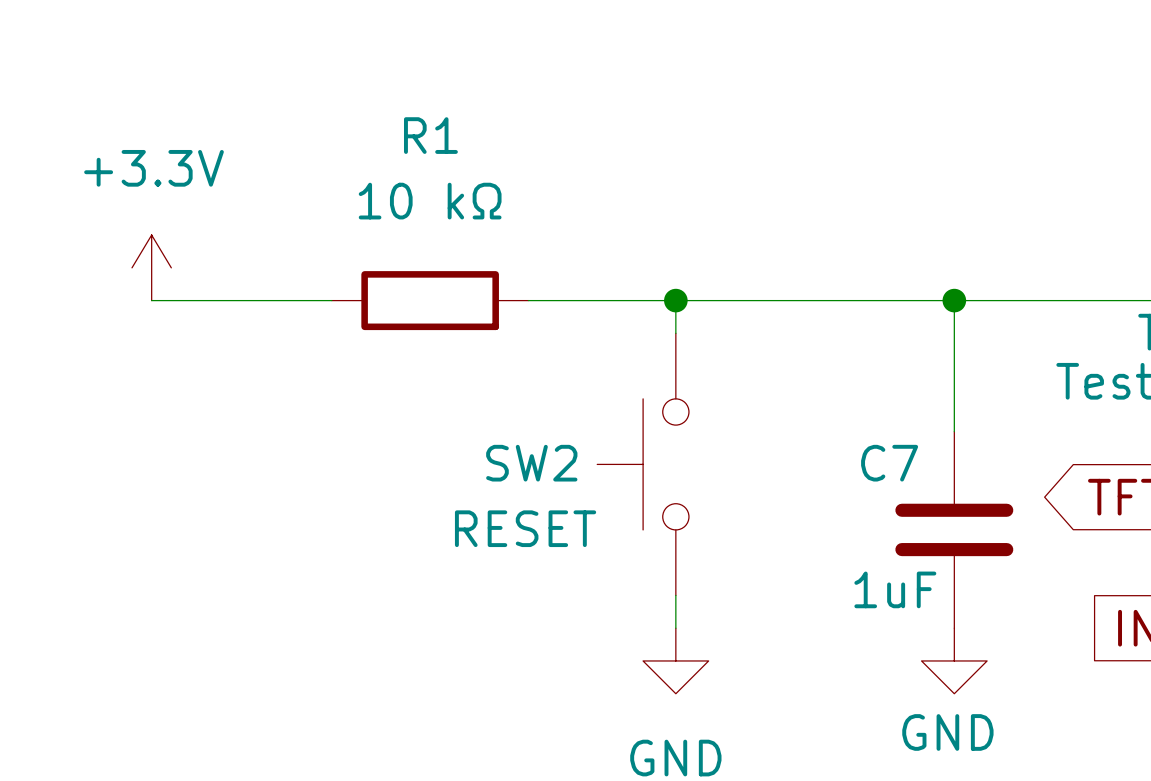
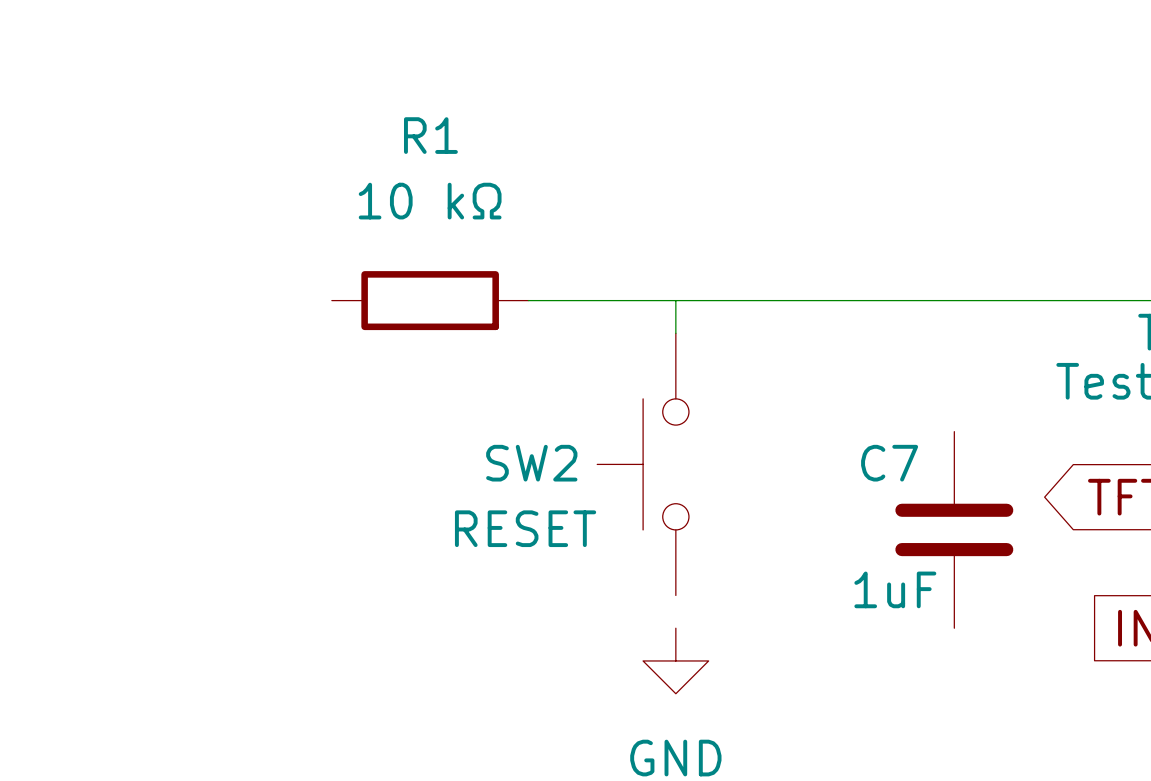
power symbol: +3.3V (151, 267) -> none
wire: (151, 300) (331, 300) -> none
junction: (675, 300) -> none
wire: (954, 300) (954, 431) -> none
junction: (954, 300) -> none
wire: (675, 595) (675, 628) -> none
power symbol: GND (954, 660) -> none

